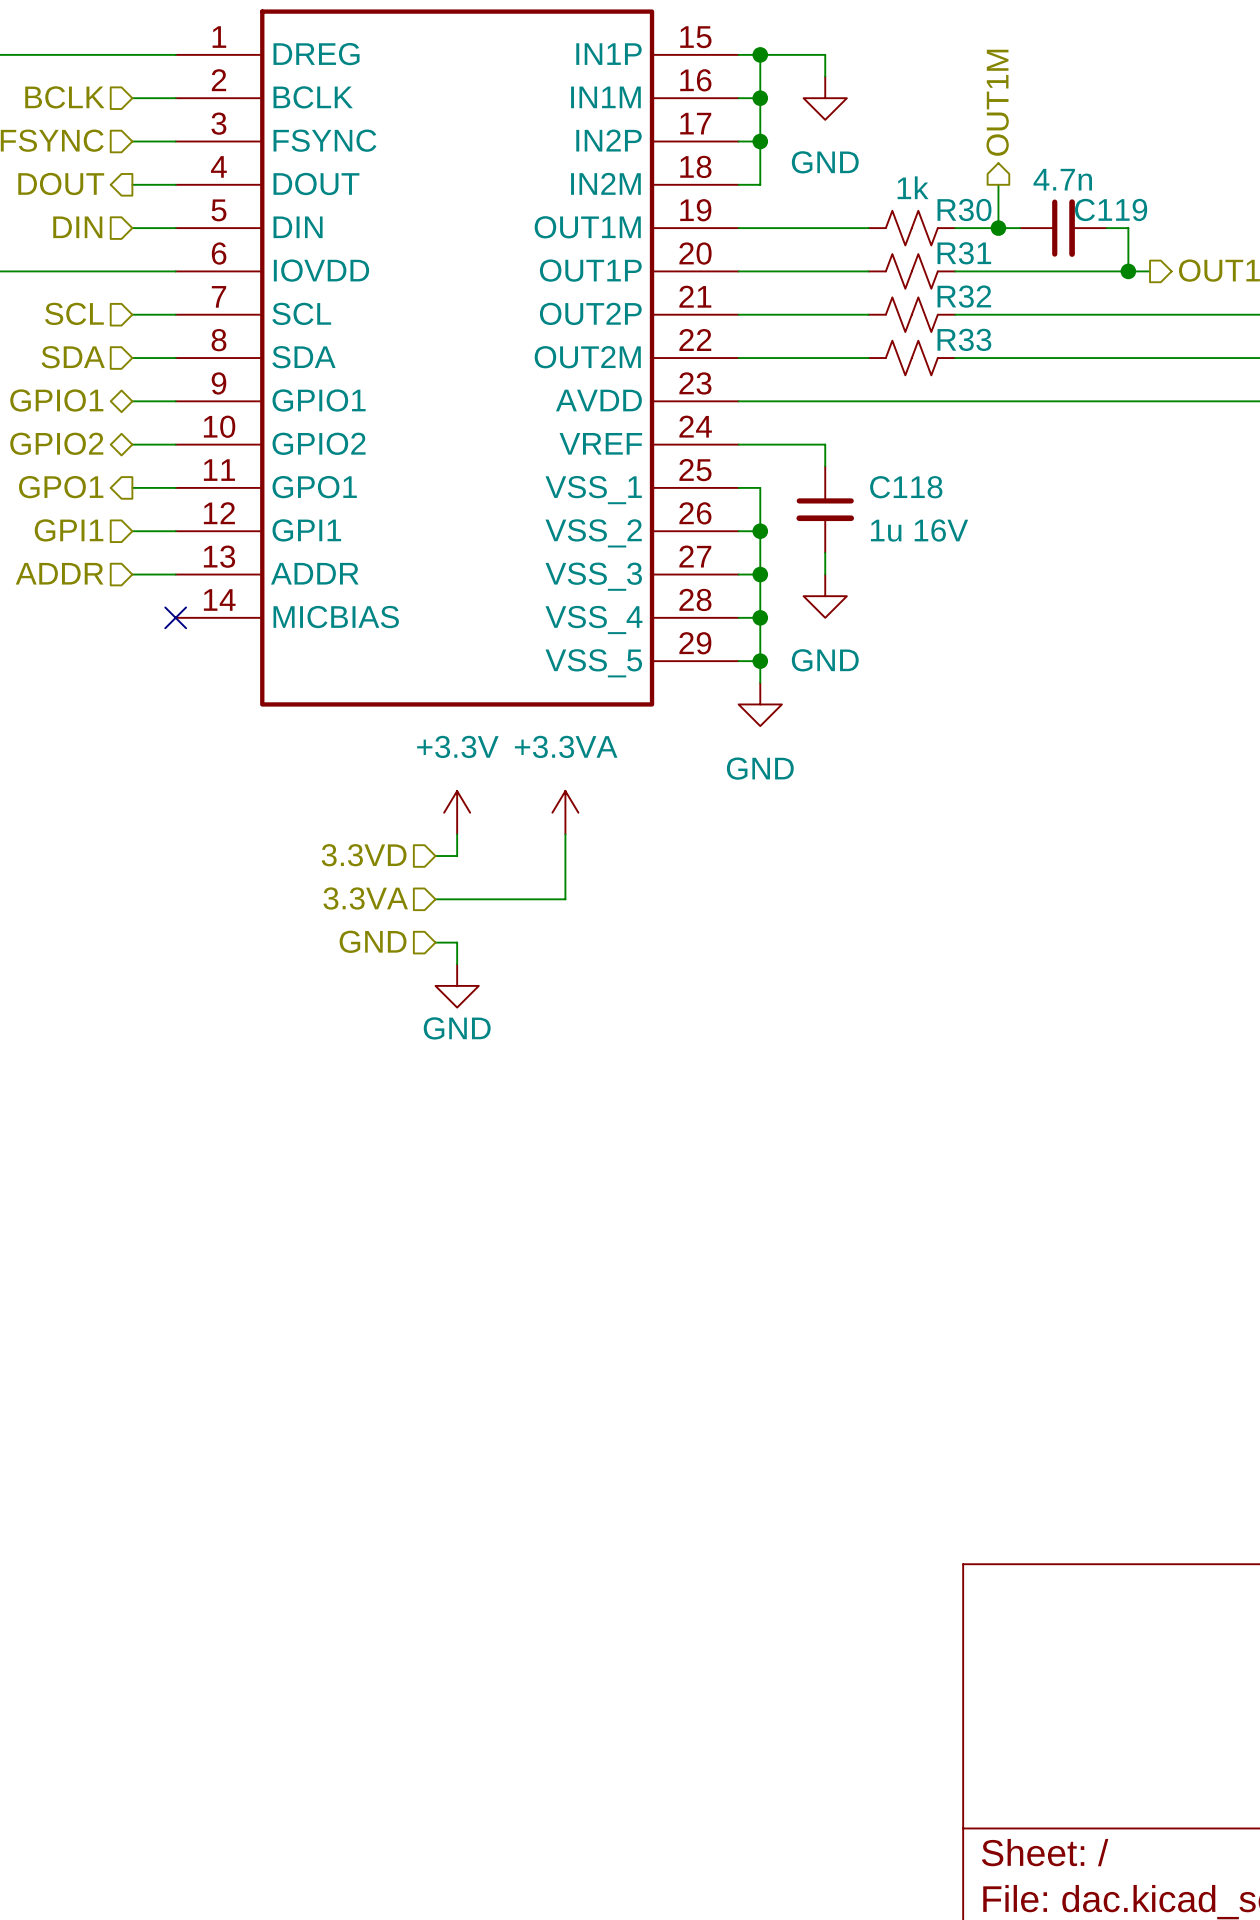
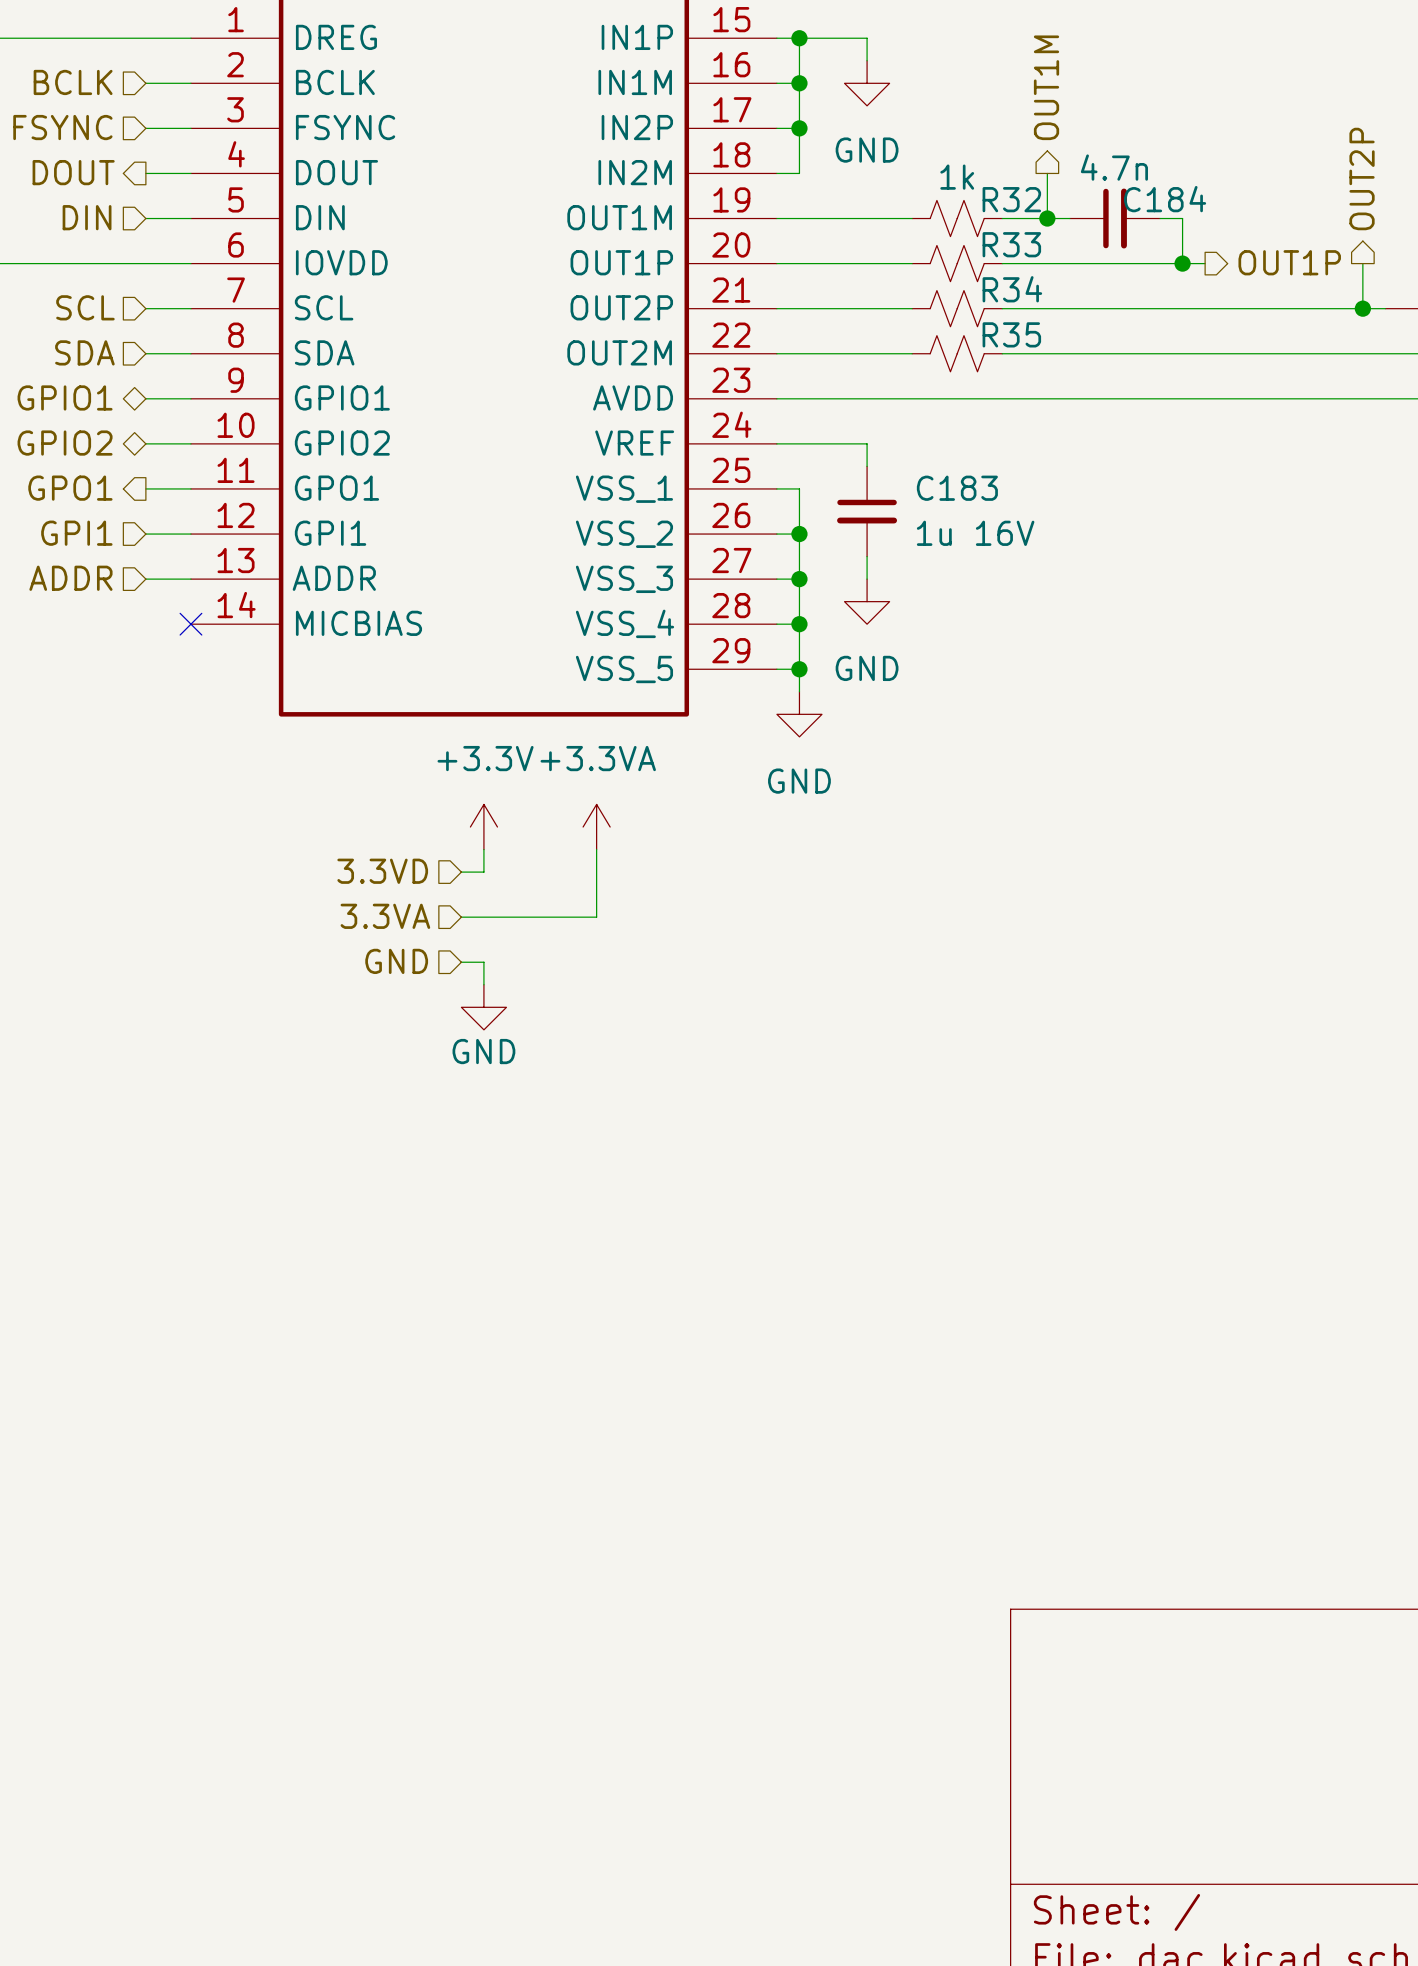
R30 name: R30 (964, 209) -> R32 (1011, 199)
C119 name: C119 (1111, 209) -> C184 (1165, 199)
R31 name: R31 (964, 253) -> R33 (1011, 244)
R32 name: R32 (964, 296) -> R34 (1012, 289)
R33 name: R33 (964, 339) -> R35 (1011, 334)
C118 name: C118 (906, 487) -> C183 (957, 488)

